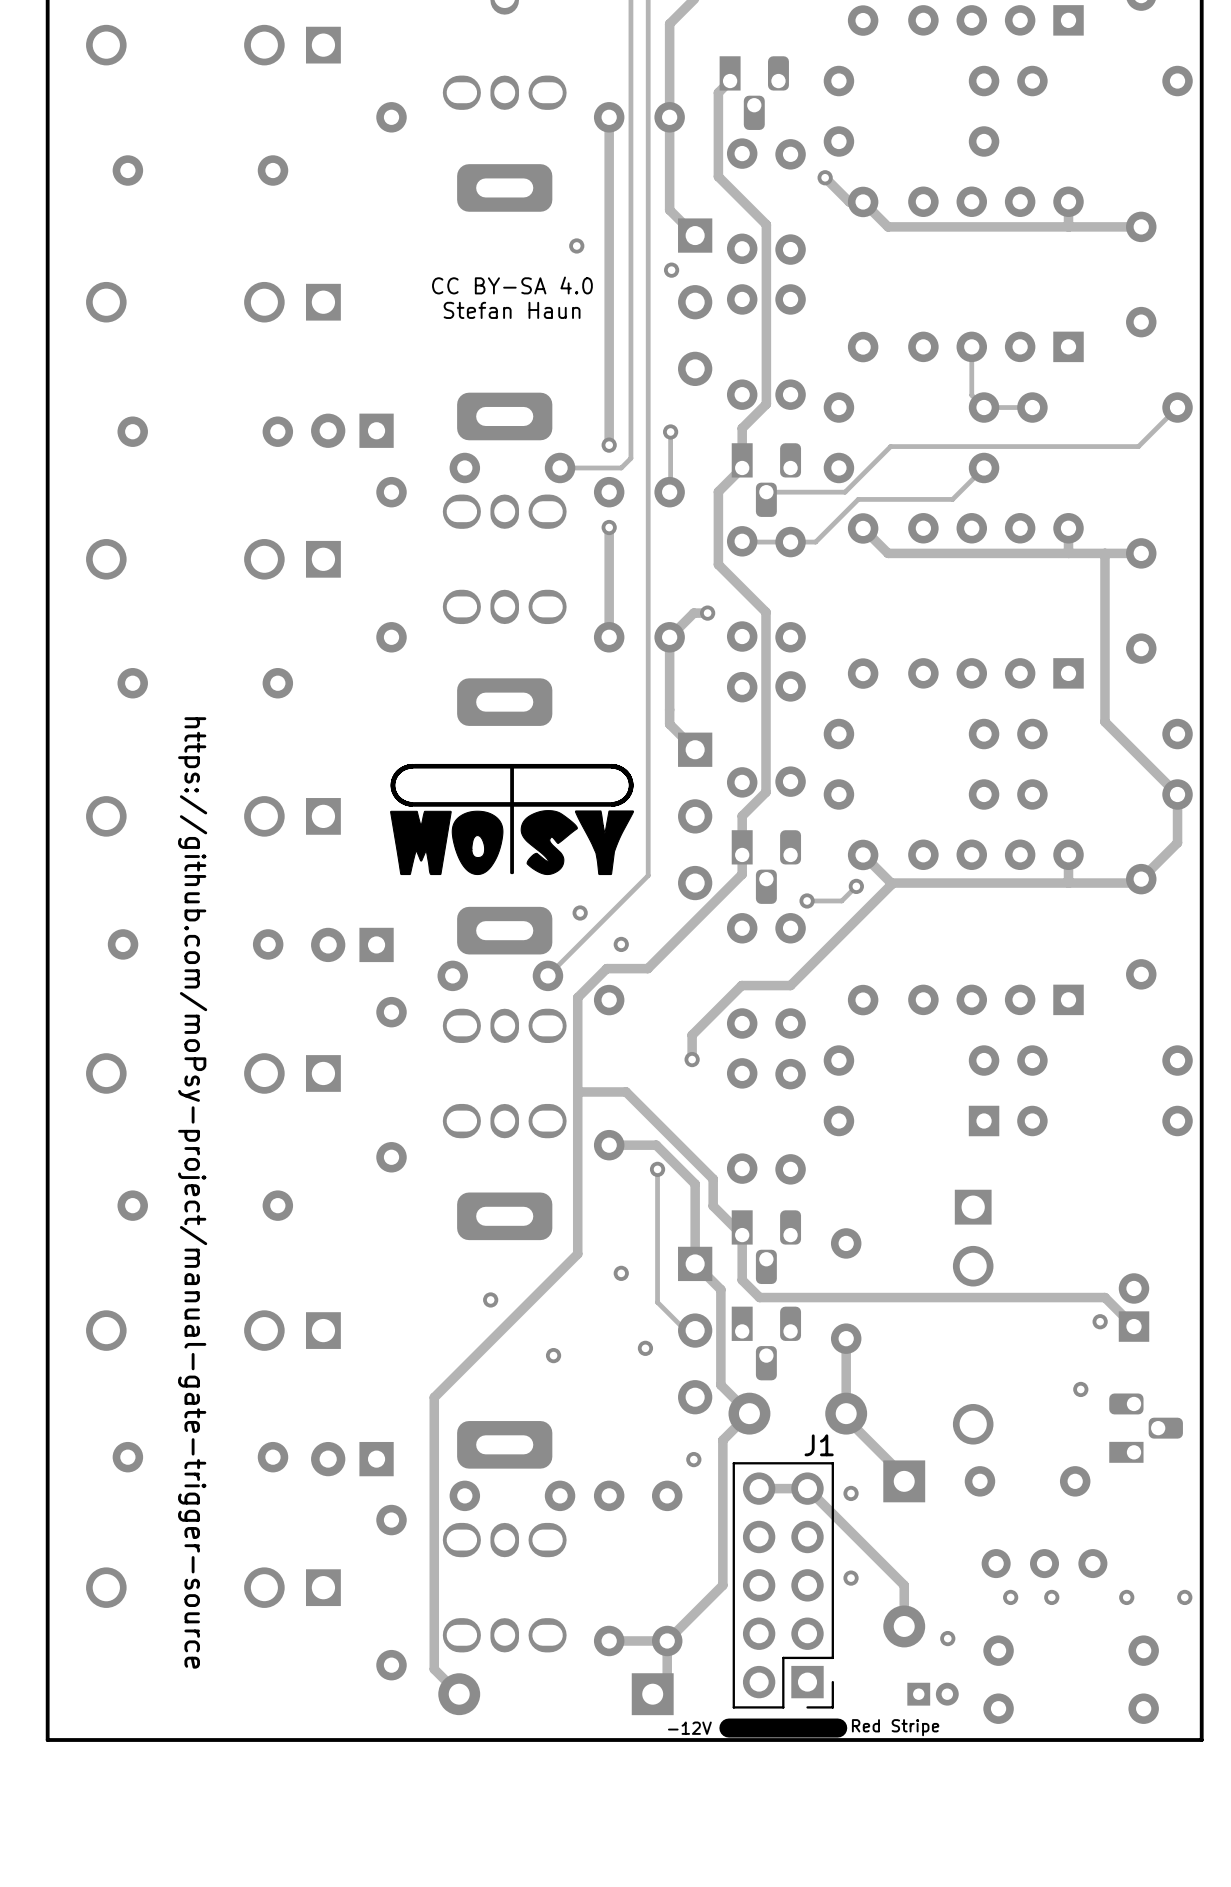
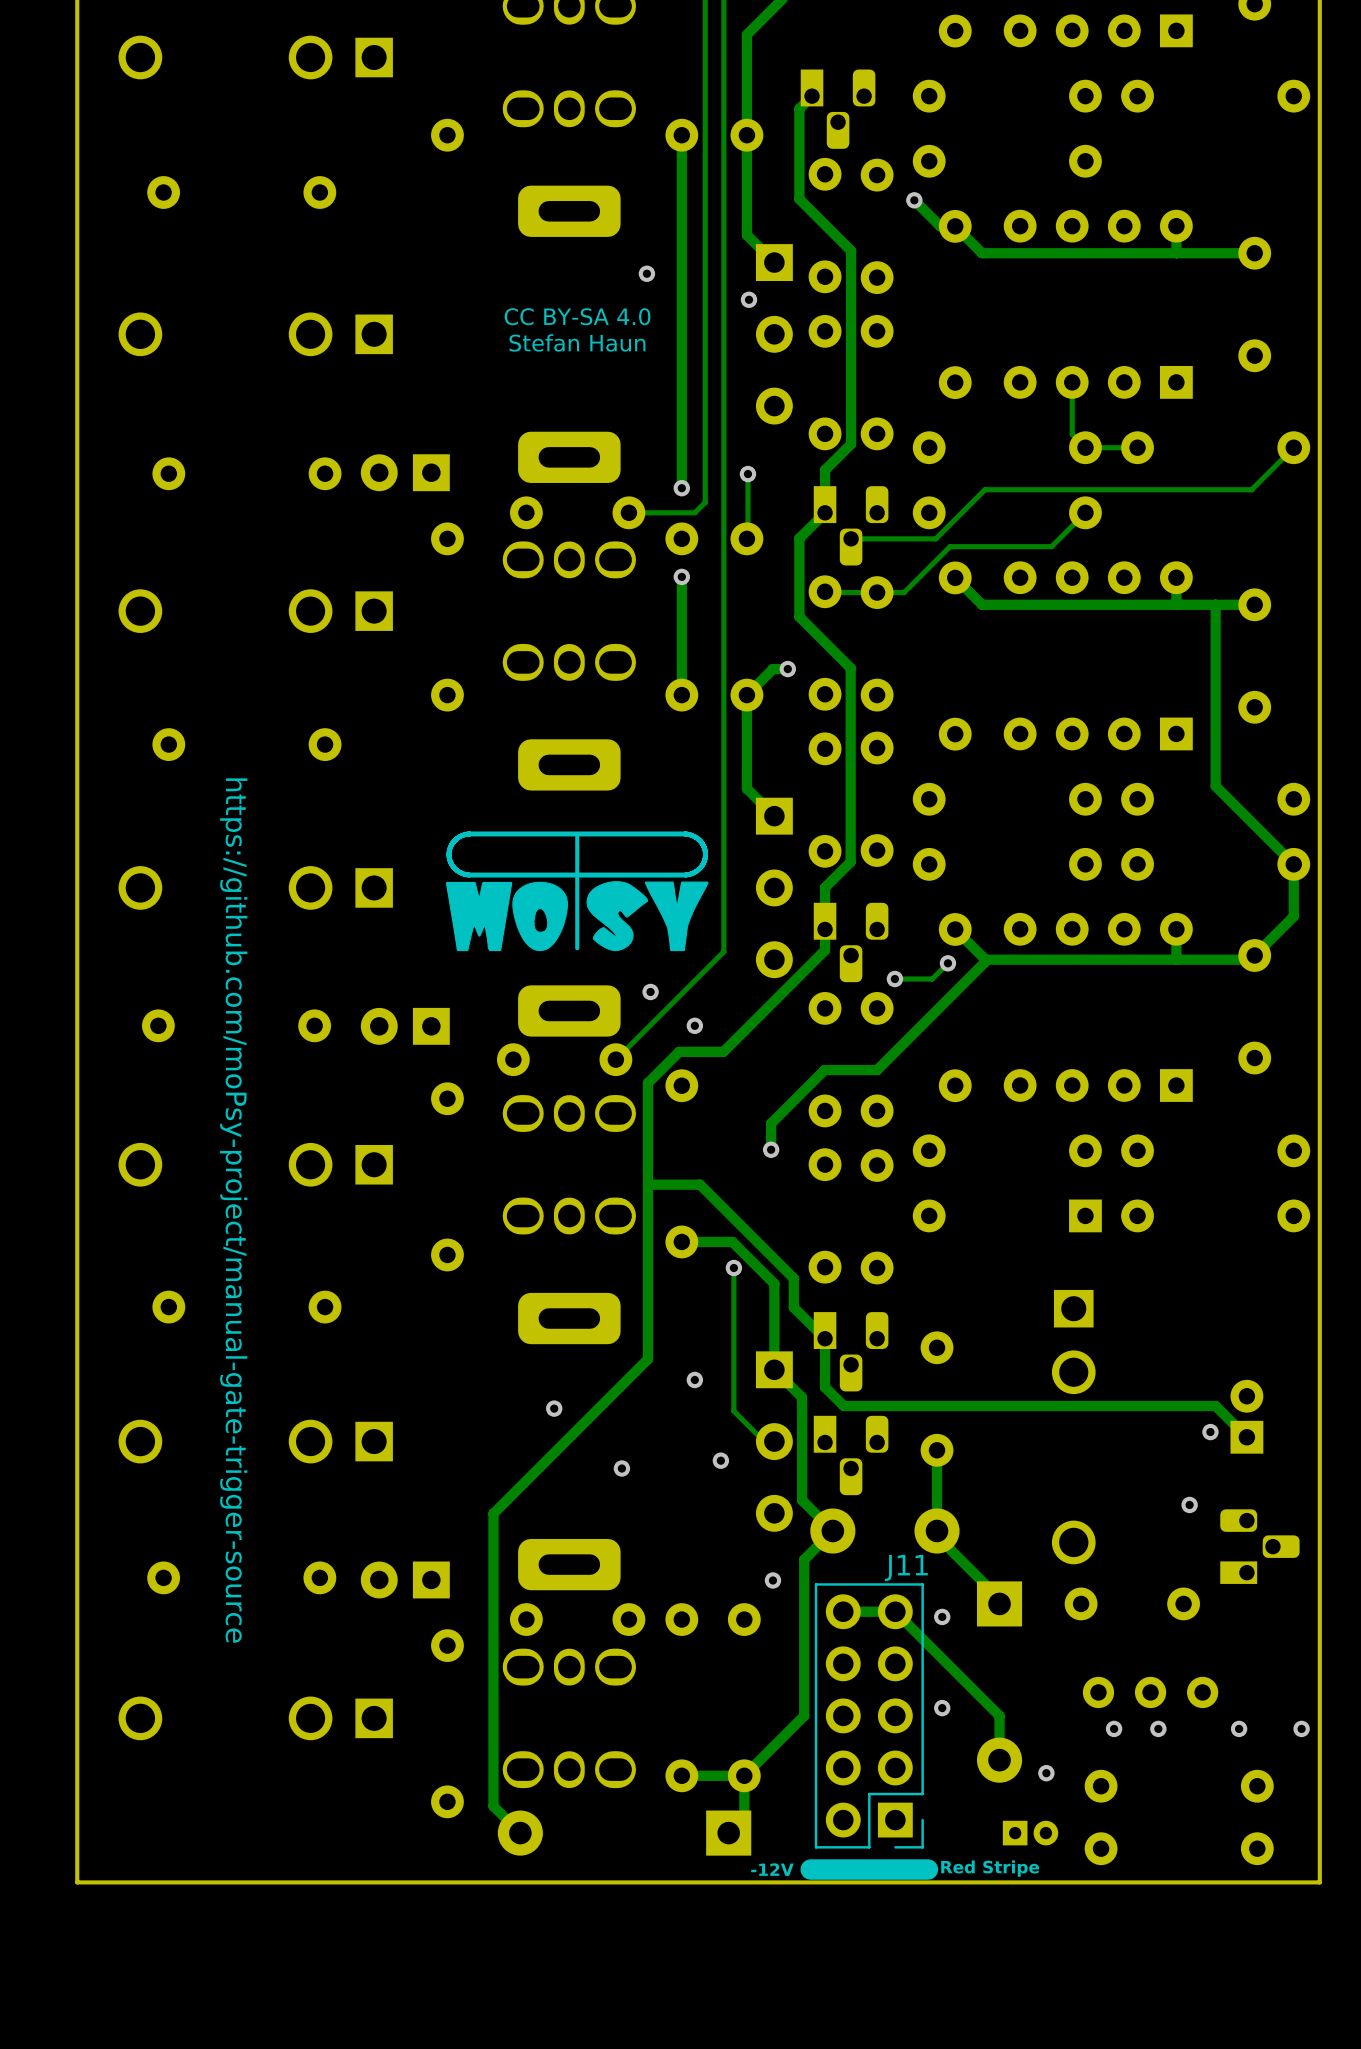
J1 name: J1 (819, 1445) -> J11 (906, 1567)

